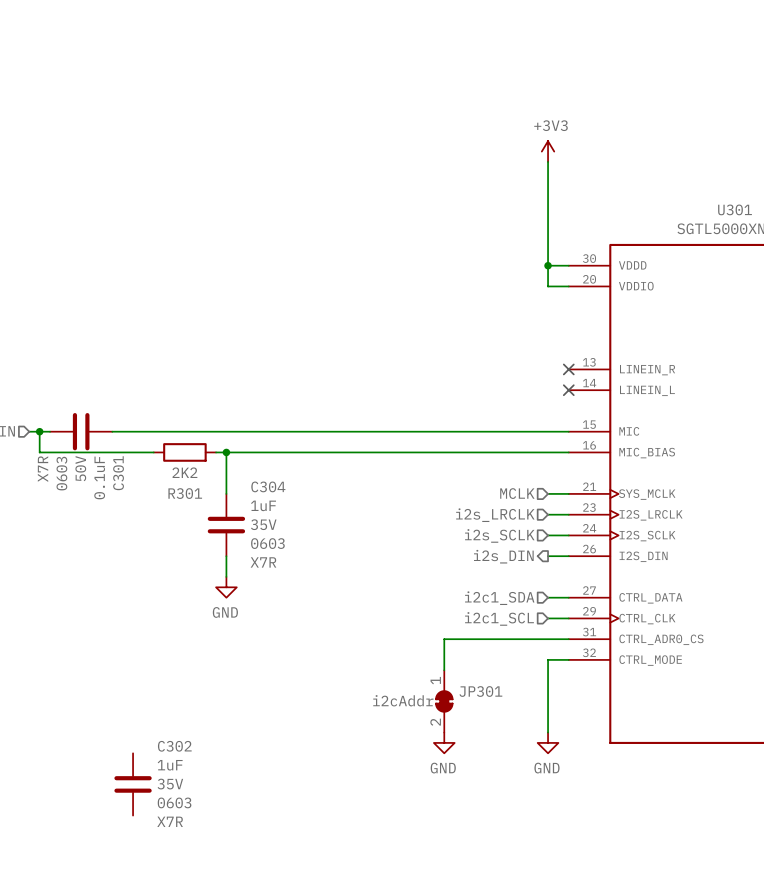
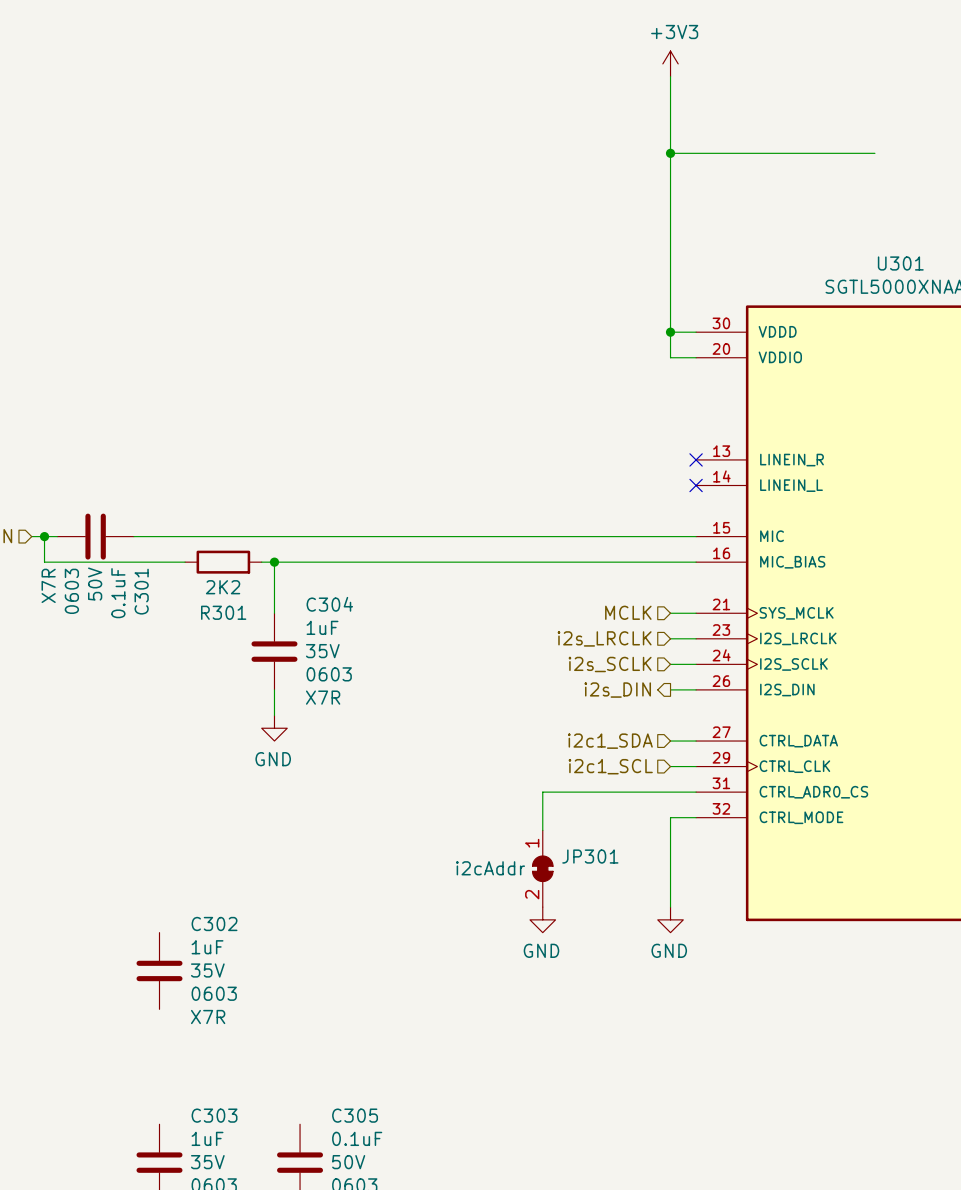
wire: none -> (670, 76) (670, 204)
wire: none -> (670, 153) (874, 153)
junction: none -> (670, 153)
power symbol position: +3V3 (548, 151) -> +3V3 (670, 63)

